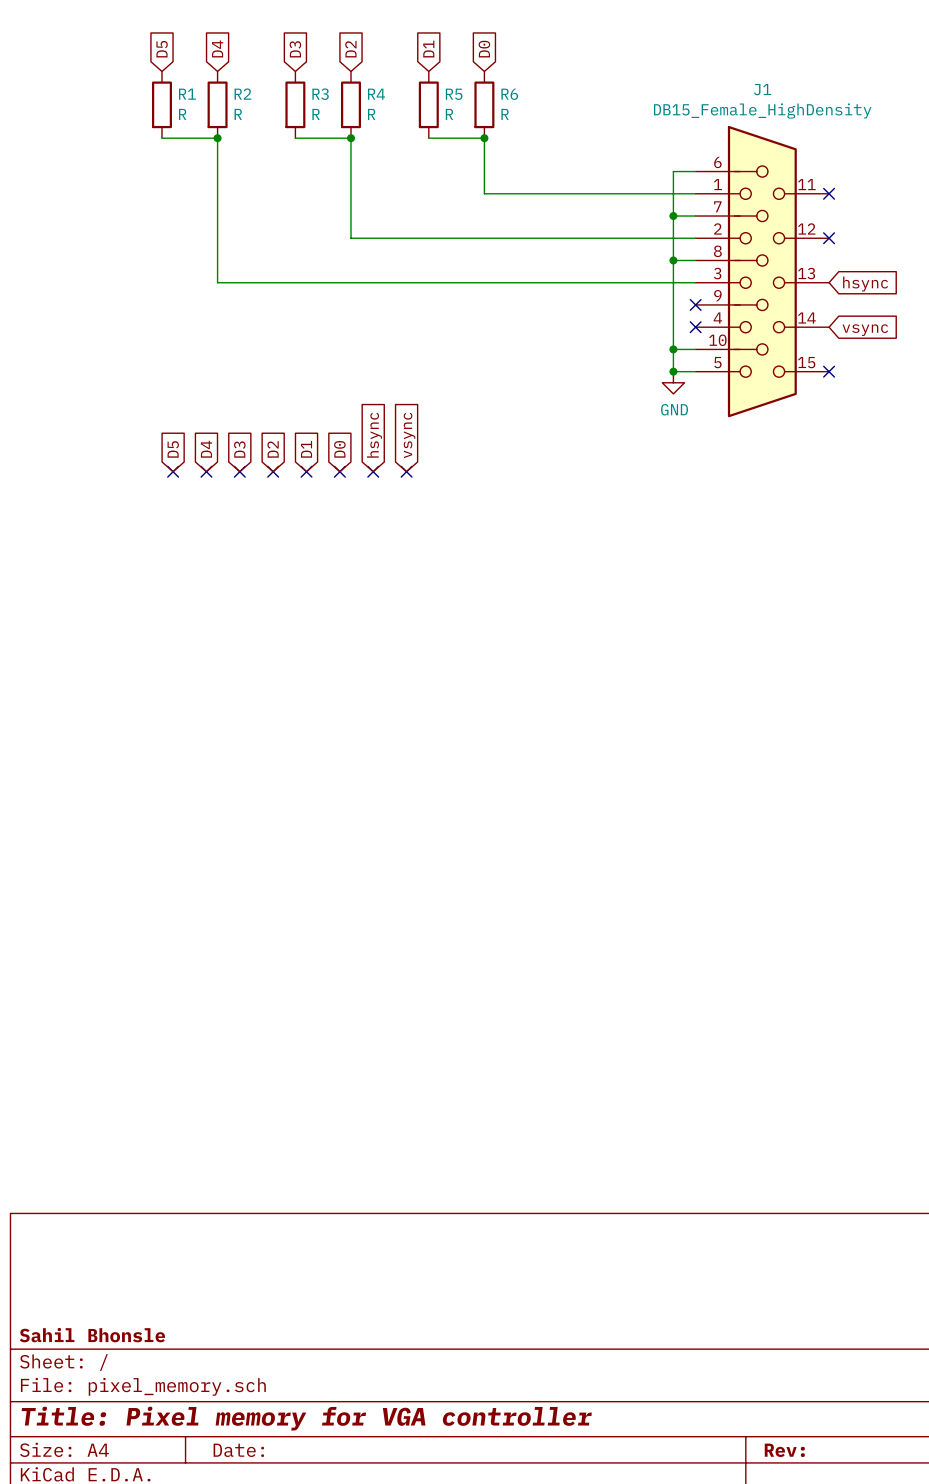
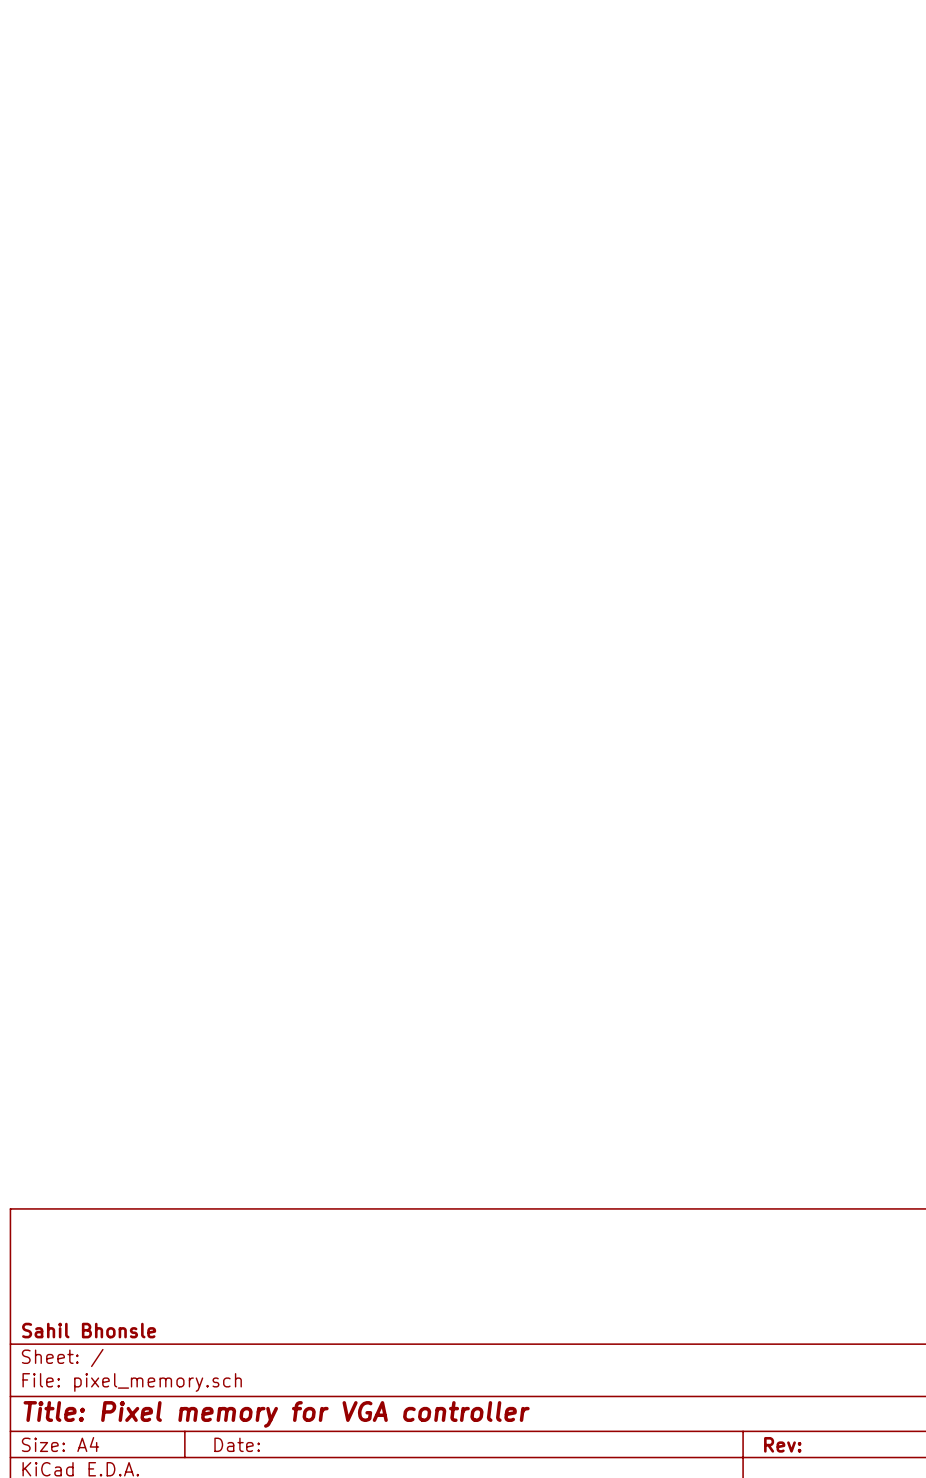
global label: D4 (217, 48) -> none
global label: D5 (162, 49) -> none
global label: D3 (295, 49) -> none
global label: D2 (350, 49) -> none
global label: D1 (428, 49) -> none
global label: D0 (484, 49) -> none
R1: R (161, 104) -> none
R2: R (217, 104) -> none
R3: R (295, 104) -> none
R4: R (350, 104) -> none
R5: R (428, 104) -> none
R6: R (484, 104) -> none
wire: (161, 138) (217, 138) (217, 282) (695, 282) -> none
junction: (217, 138) -> none
wire: (295, 138) (350, 138) (350, 238) (695, 238) -> none
junction: (350, 138) -> none
wire: (428, 138) (484, 138) (484, 193) (695, 193) -> none
junction: (484, 138) -> none
wire: (695, 171) (673, 171) (673, 371) (695, 371) -> none
no-connect mark: (829, 193) -> none
wire: (673, 216) (695, 216) -> none
junction: (673, 216) -> none
no-connect mark: (829, 238) -> none
wire: (673, 260) (695, 260) -> none
junction: (673, 260) -> none
J1: DB15_Female_HighDensity (762, 271) -> none
global label: hsync (865, 283) -> none
no-connect mark: (695, 304) -> none
no-connect mark: (695, 327) -> none
global label: vsync (865, 330) -> none
wire: (673, 349) (695, 349) -> none
junction: (673, 349) -> none
junction: (673, 371) -> none
no-connect mark: (829, 371) -> none
power symbol: GND (673, 382) -> none
global label: hsync (374, 435) -> none
global label: vsync (409, 435) -> none
global label: D5 (173, 449) -> none
global label: D4 (206, 449) -> none
global label: D3 (239, 449) -> none
global label: D2 (273, 449) -> none
global label: D1 (306, 449) -> none
global label: D0 (339, 449) -> none
no-connect mark: (173, 471) -> none
no-connect mark: (206, 471) -> none
no-connect mark: (239, 471) -> none
no-connect mark: (273, 471) -> none
no-connect mark: (306, 471) -> none
no-connect mark: (339, 471) -> none
no-connect mark: (373, 471) -> none
no-connect mark: (406, 471) -> none

